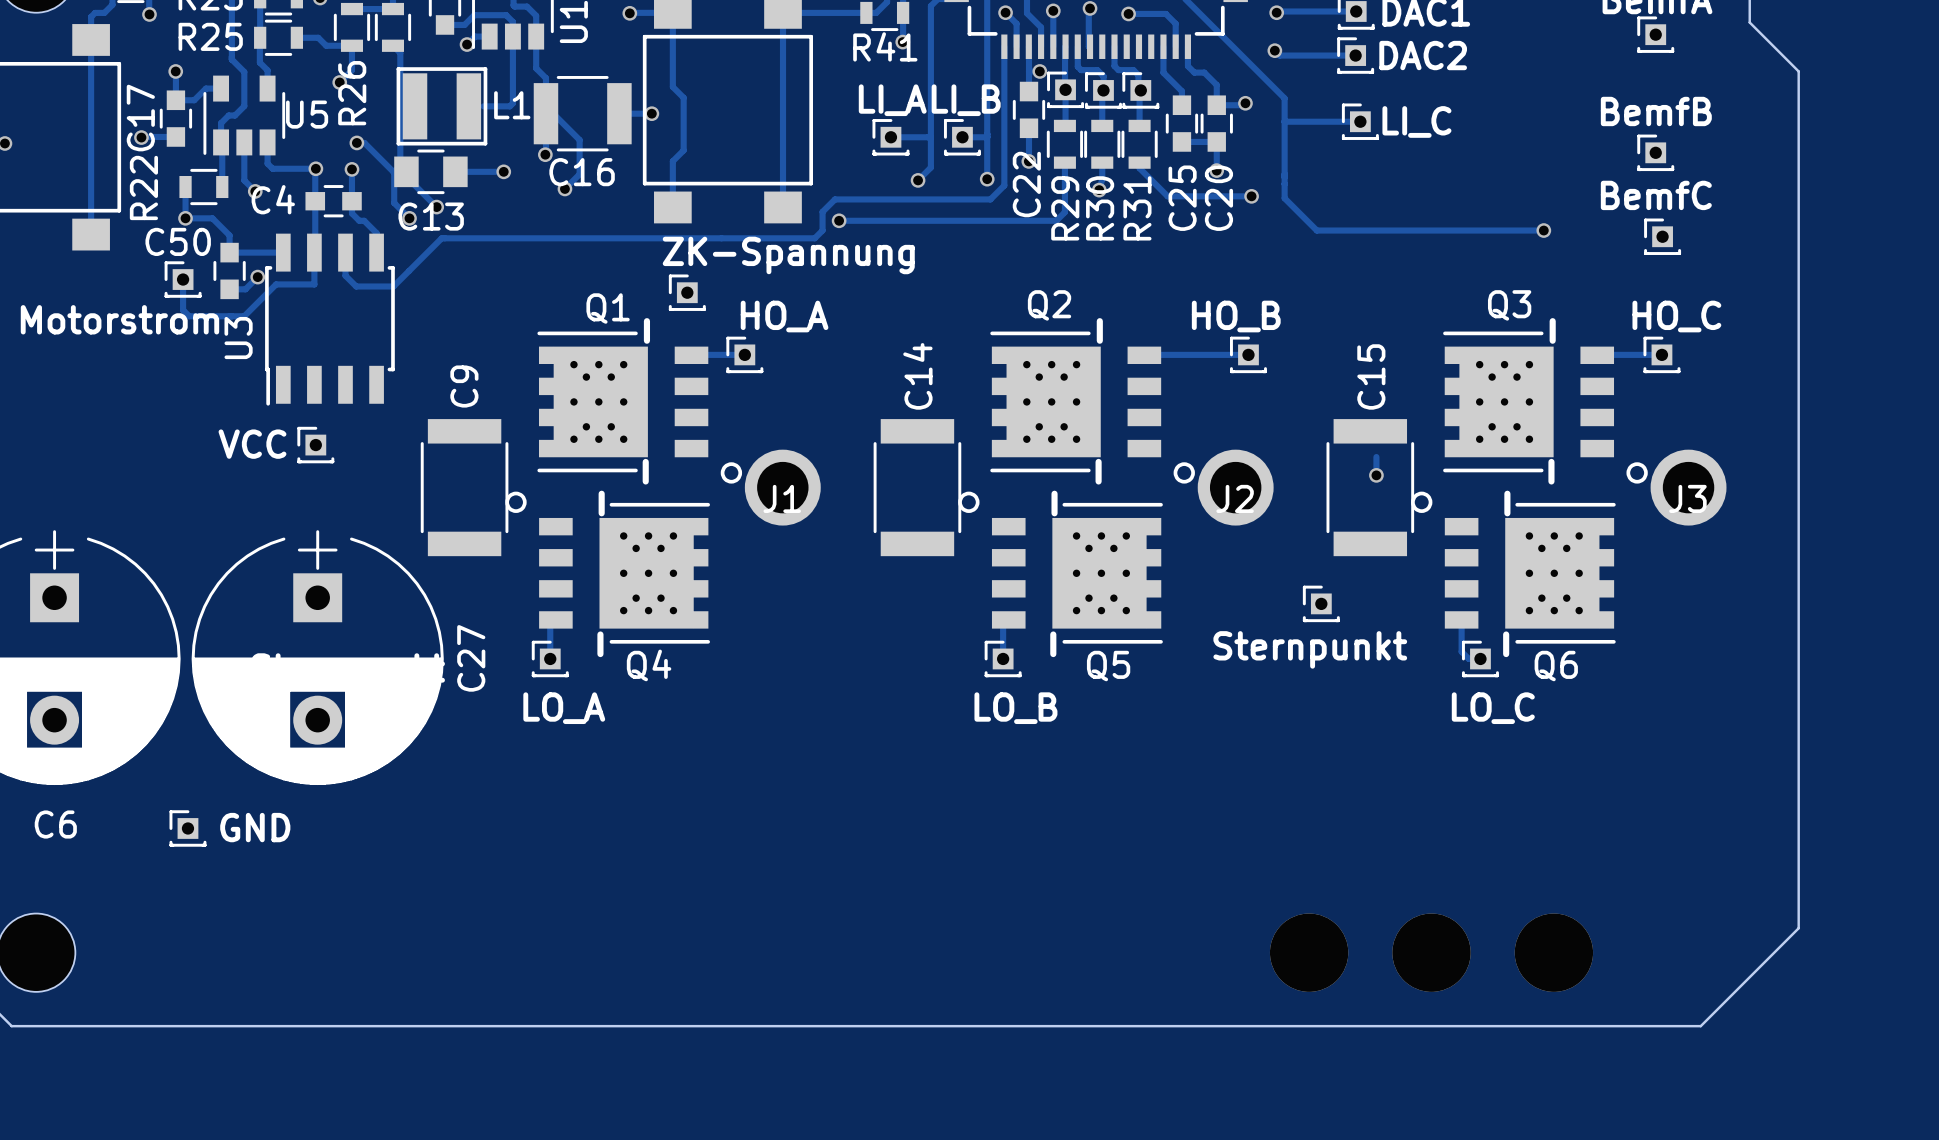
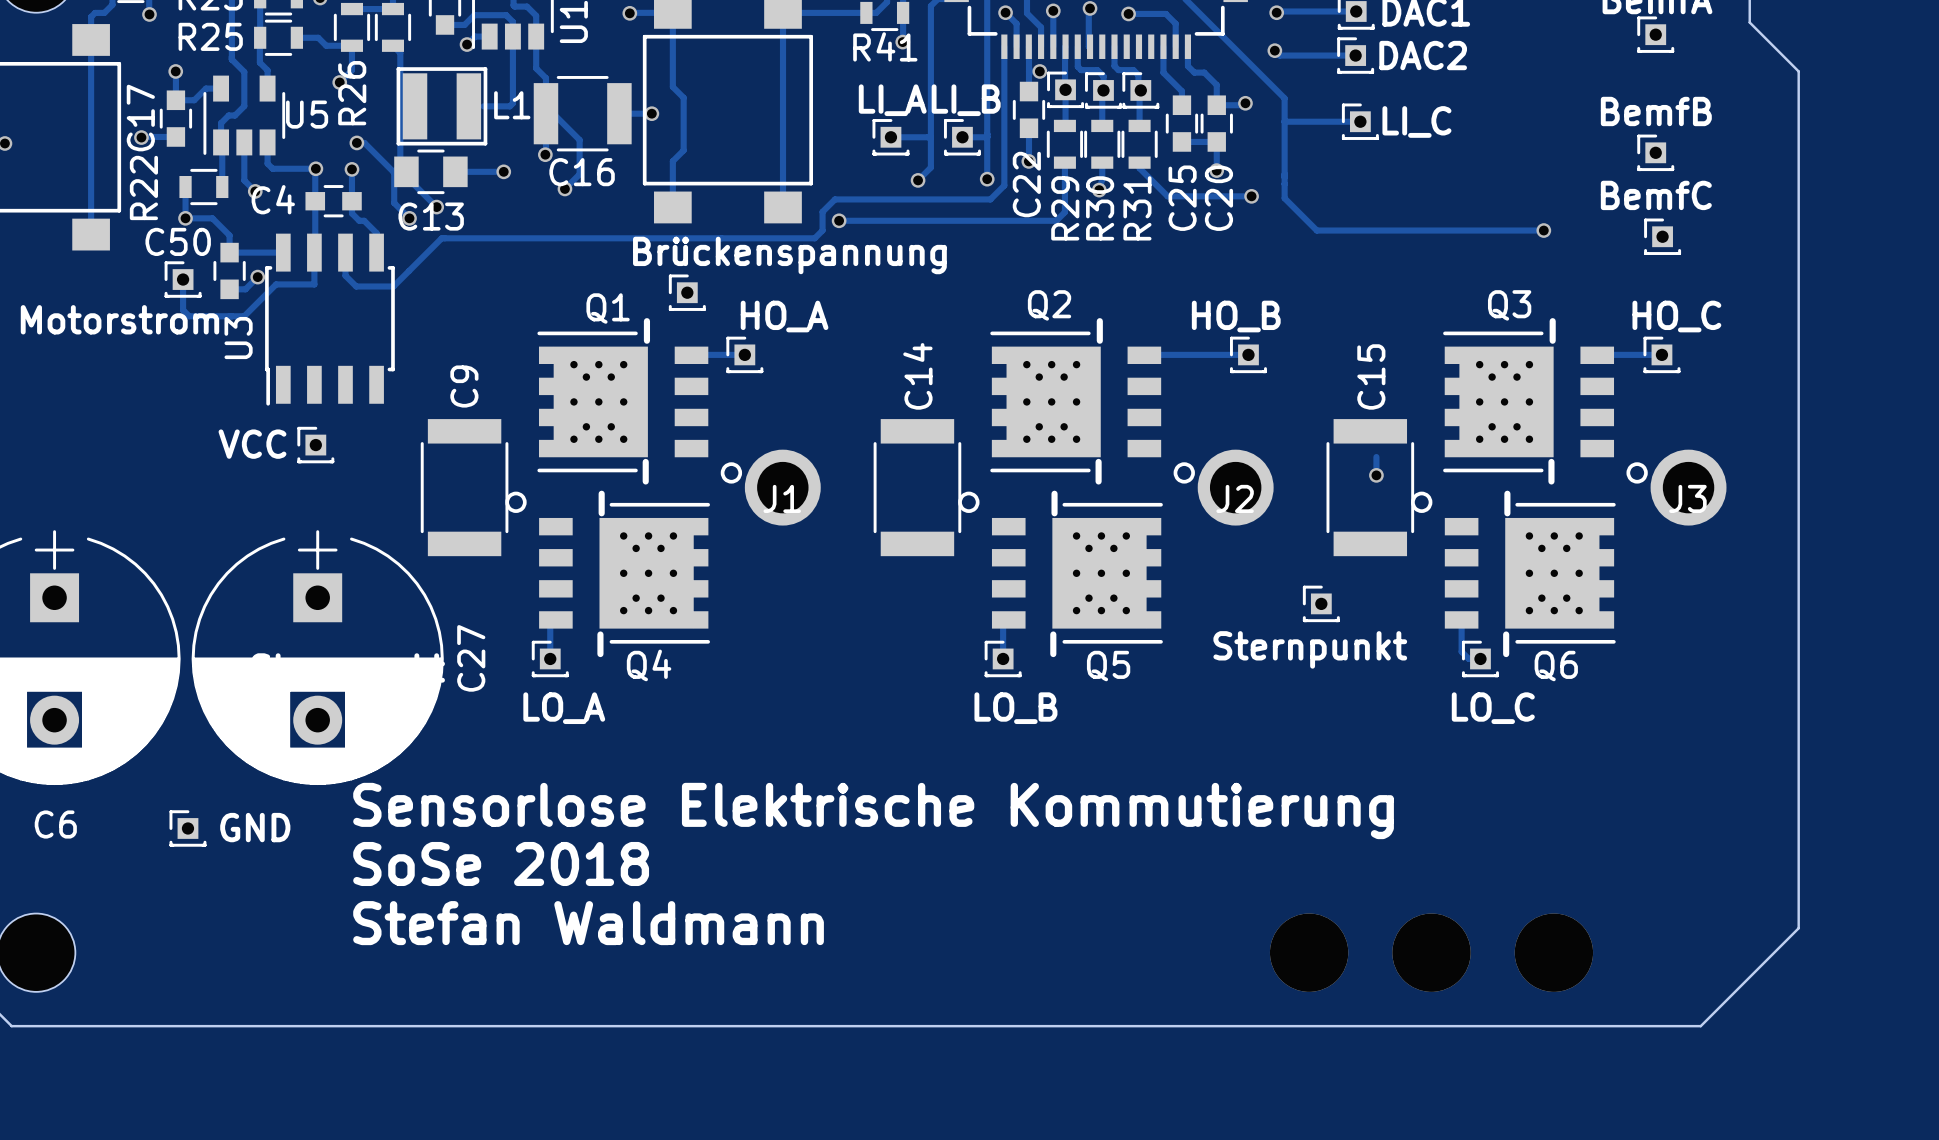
text: ZK-Spannung (788, 255) -> Brückenspannung (789, 255)
text: none -> Sensorlose Elektrische Kommutierung (873, 810)
text: none -> SoSe 2018 (501, 863)
text: none -> Stefan Waldmann (588, 923)

